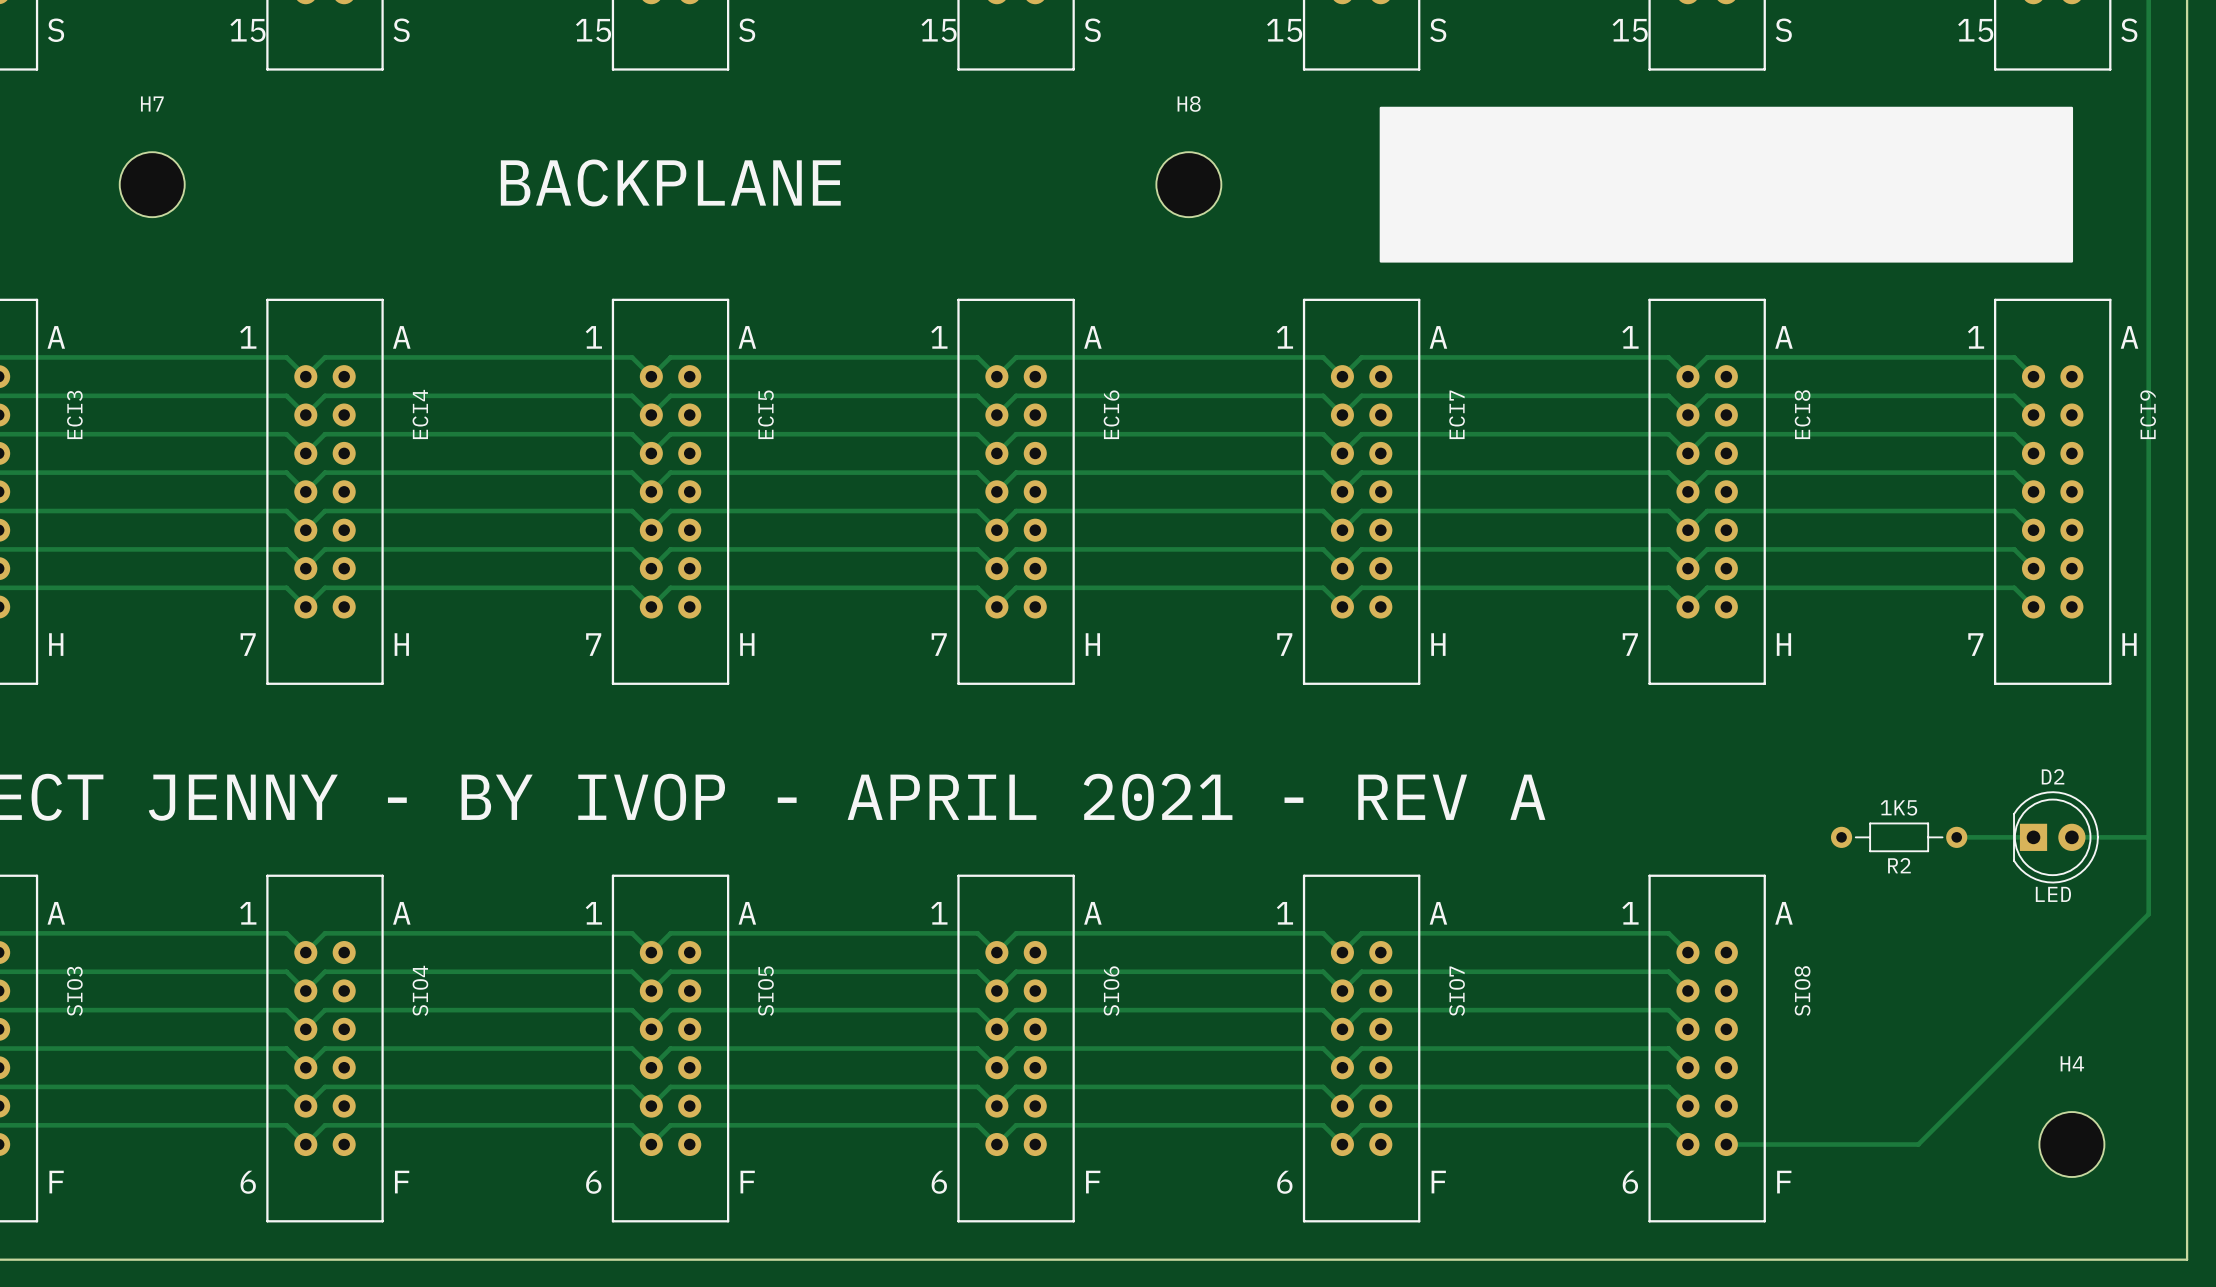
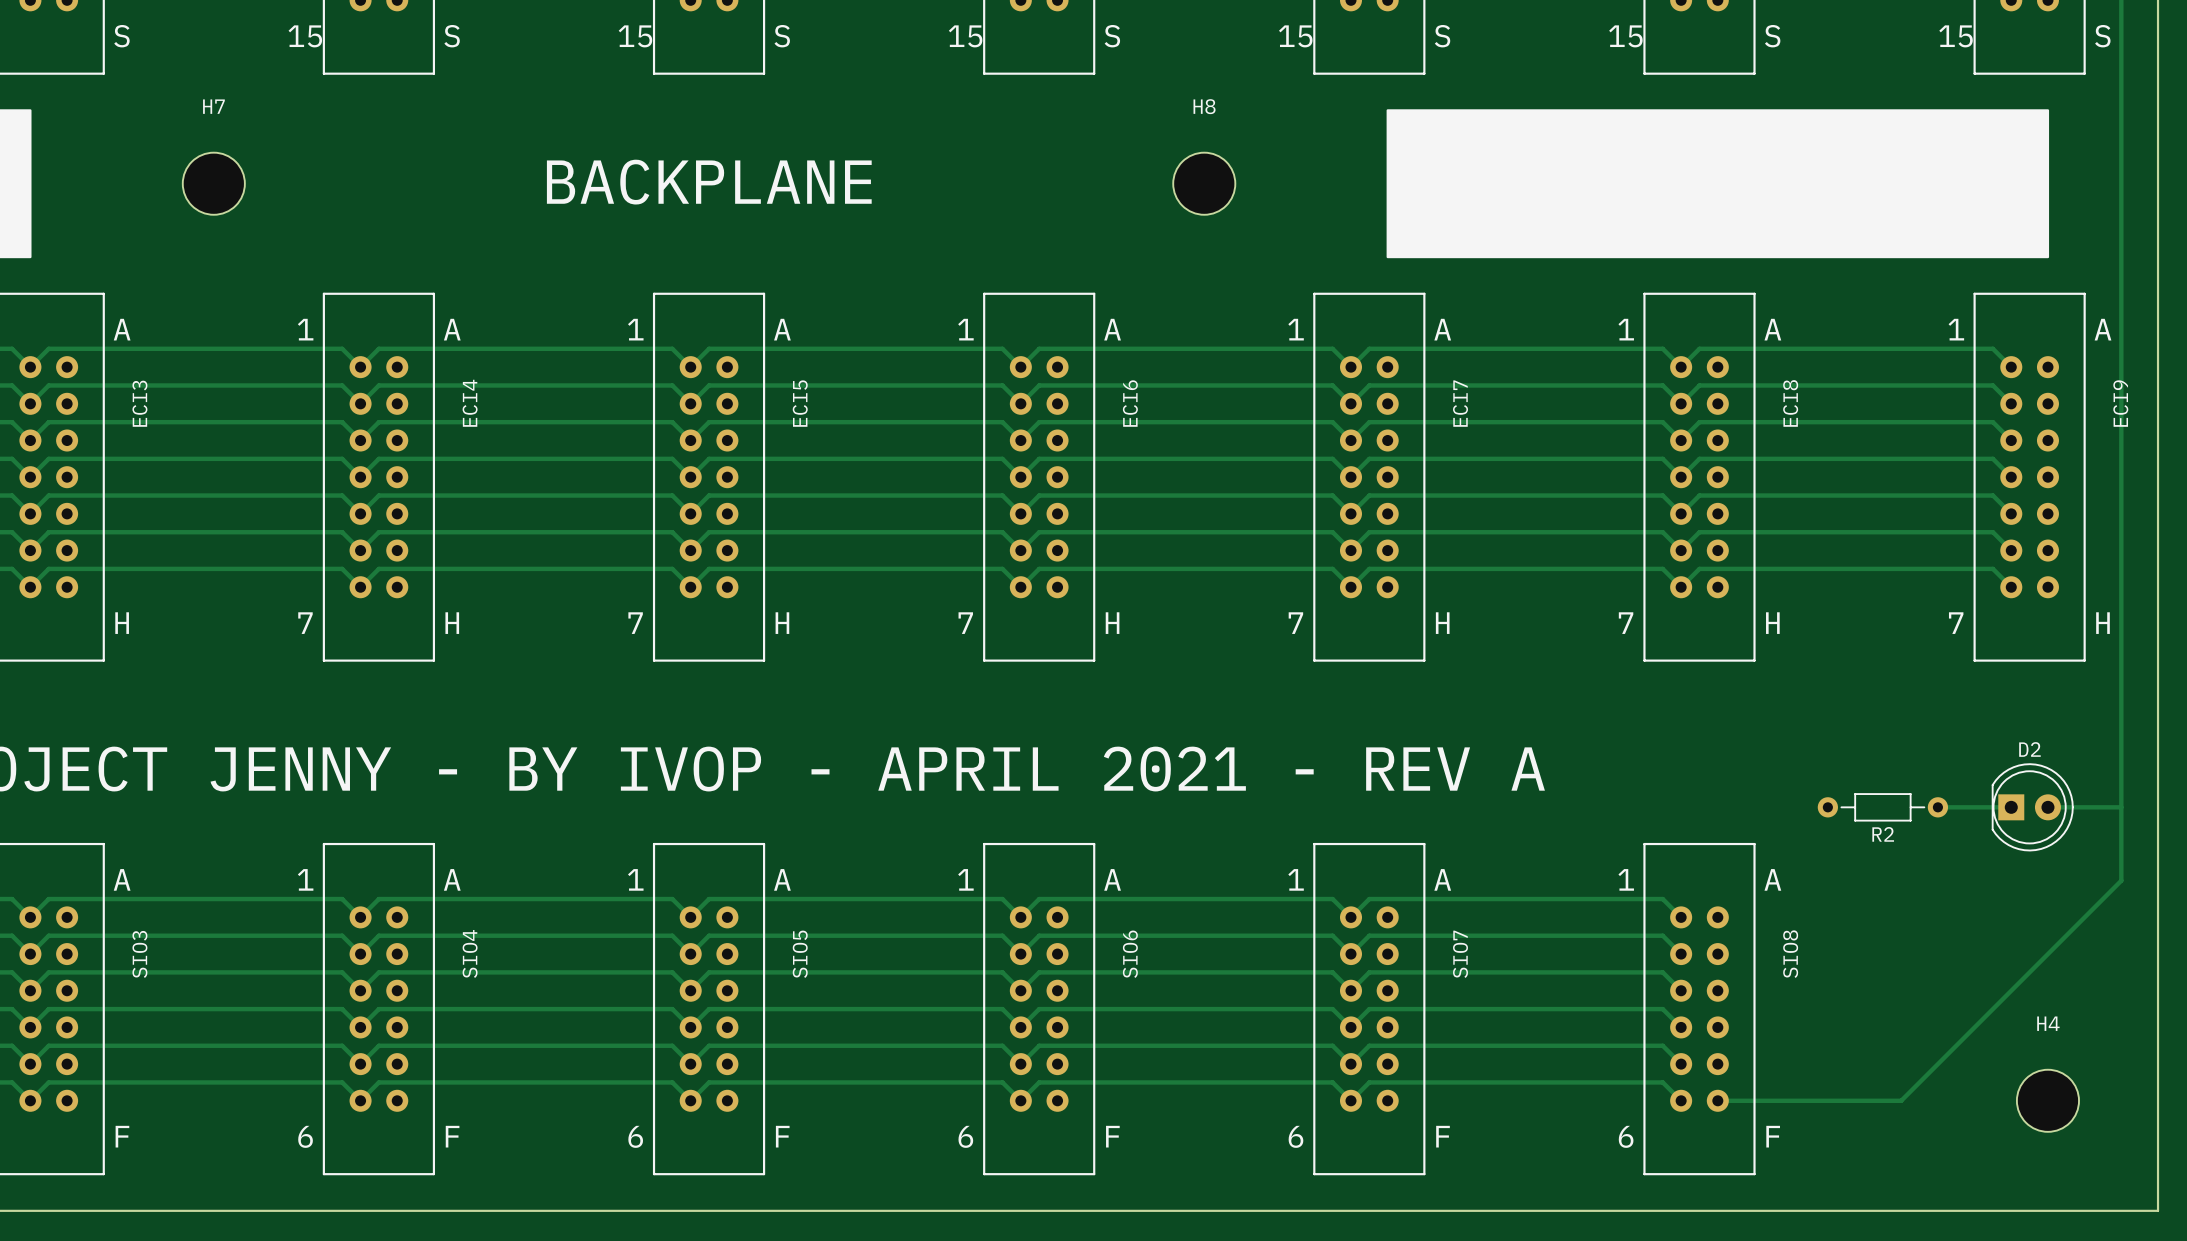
R2 value: 1K5 (1898, 807) -> none
D2 value: LED (2053, 894) -> none

